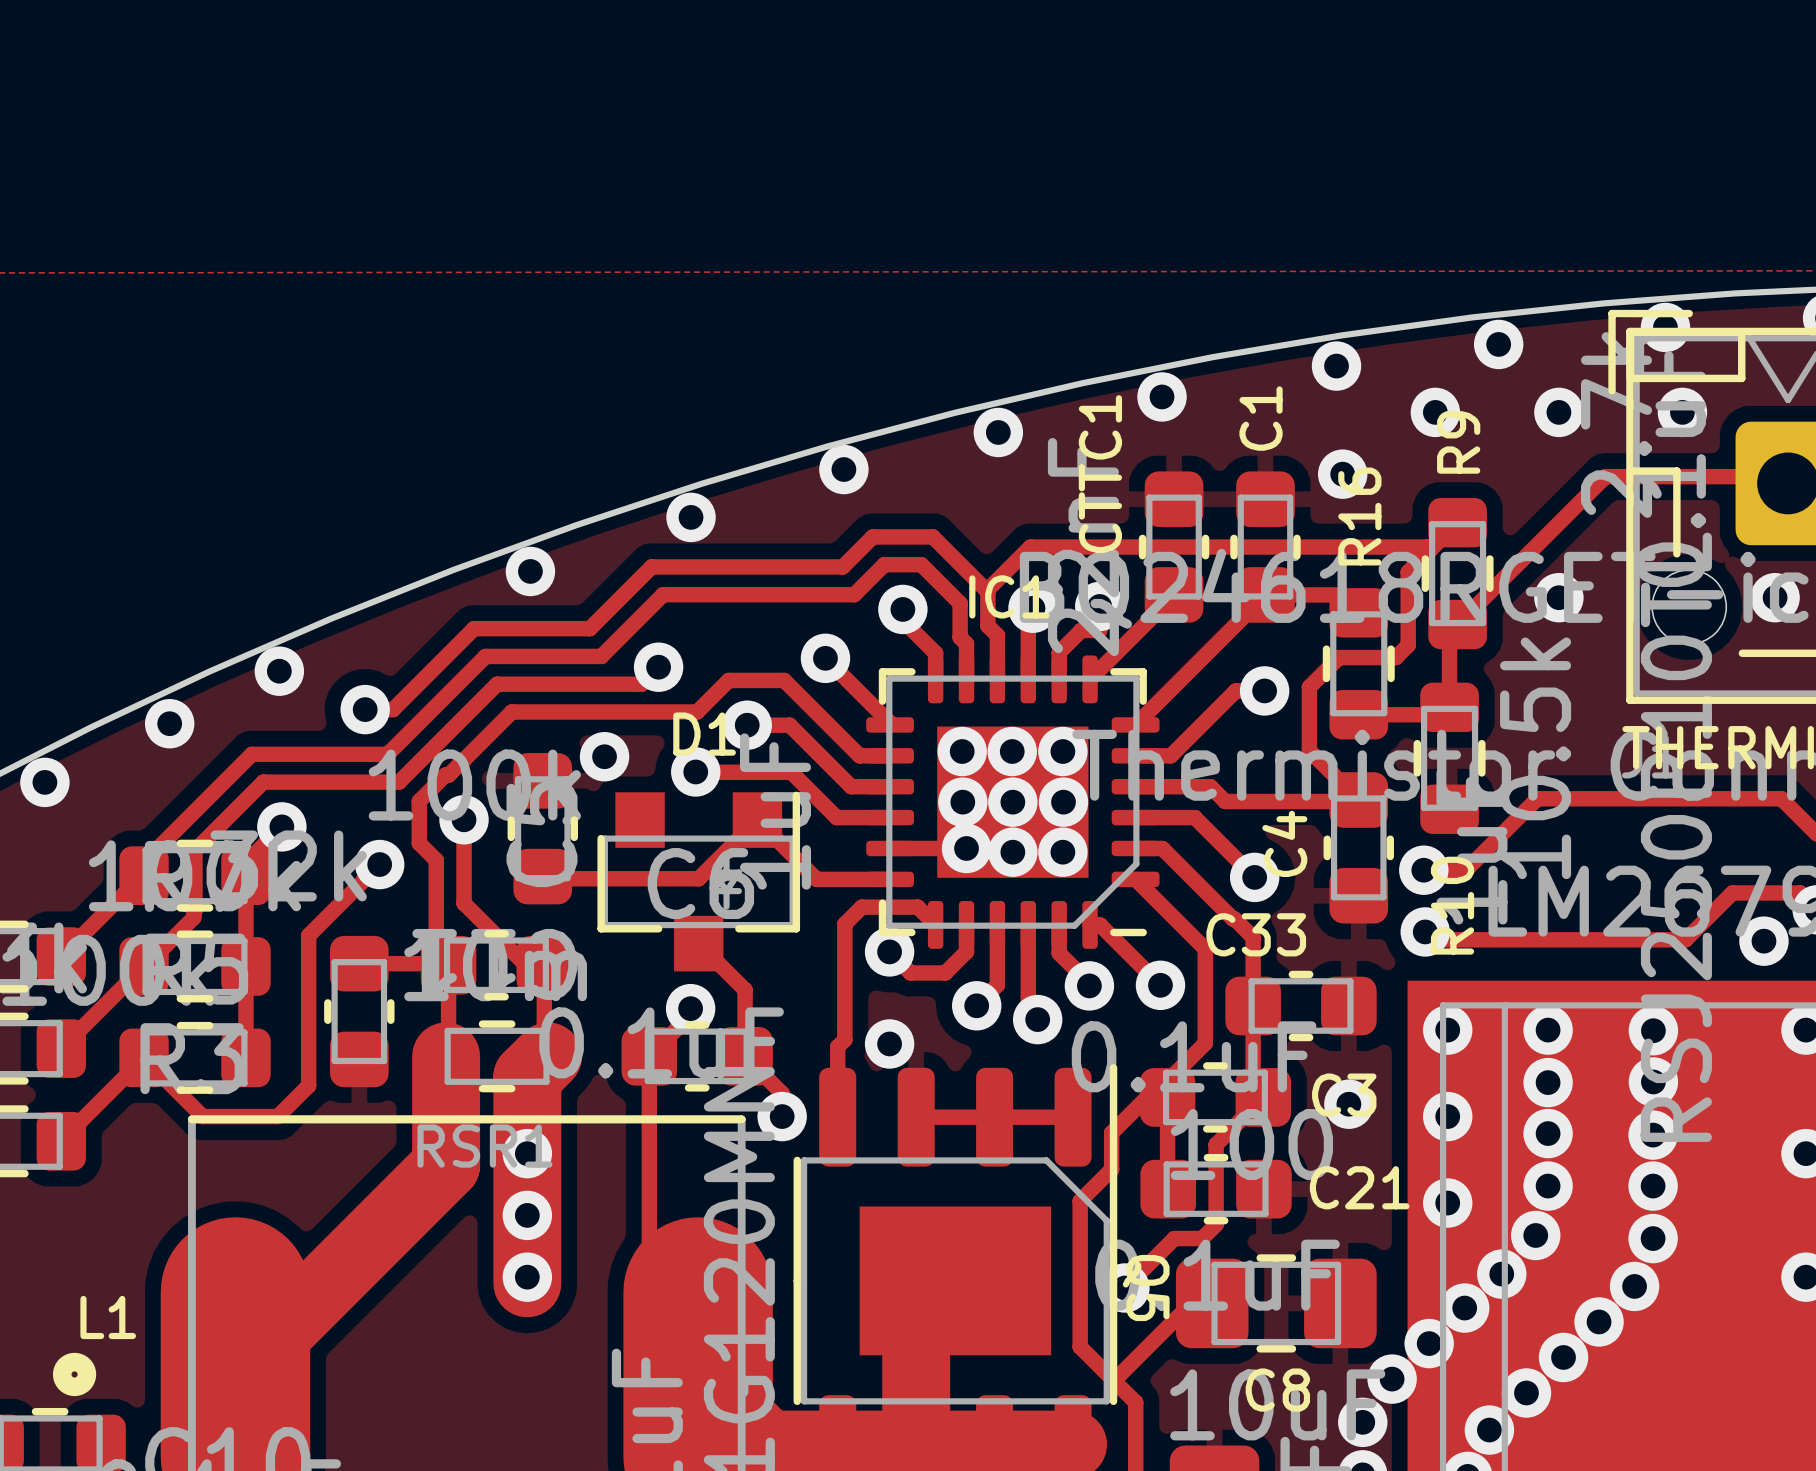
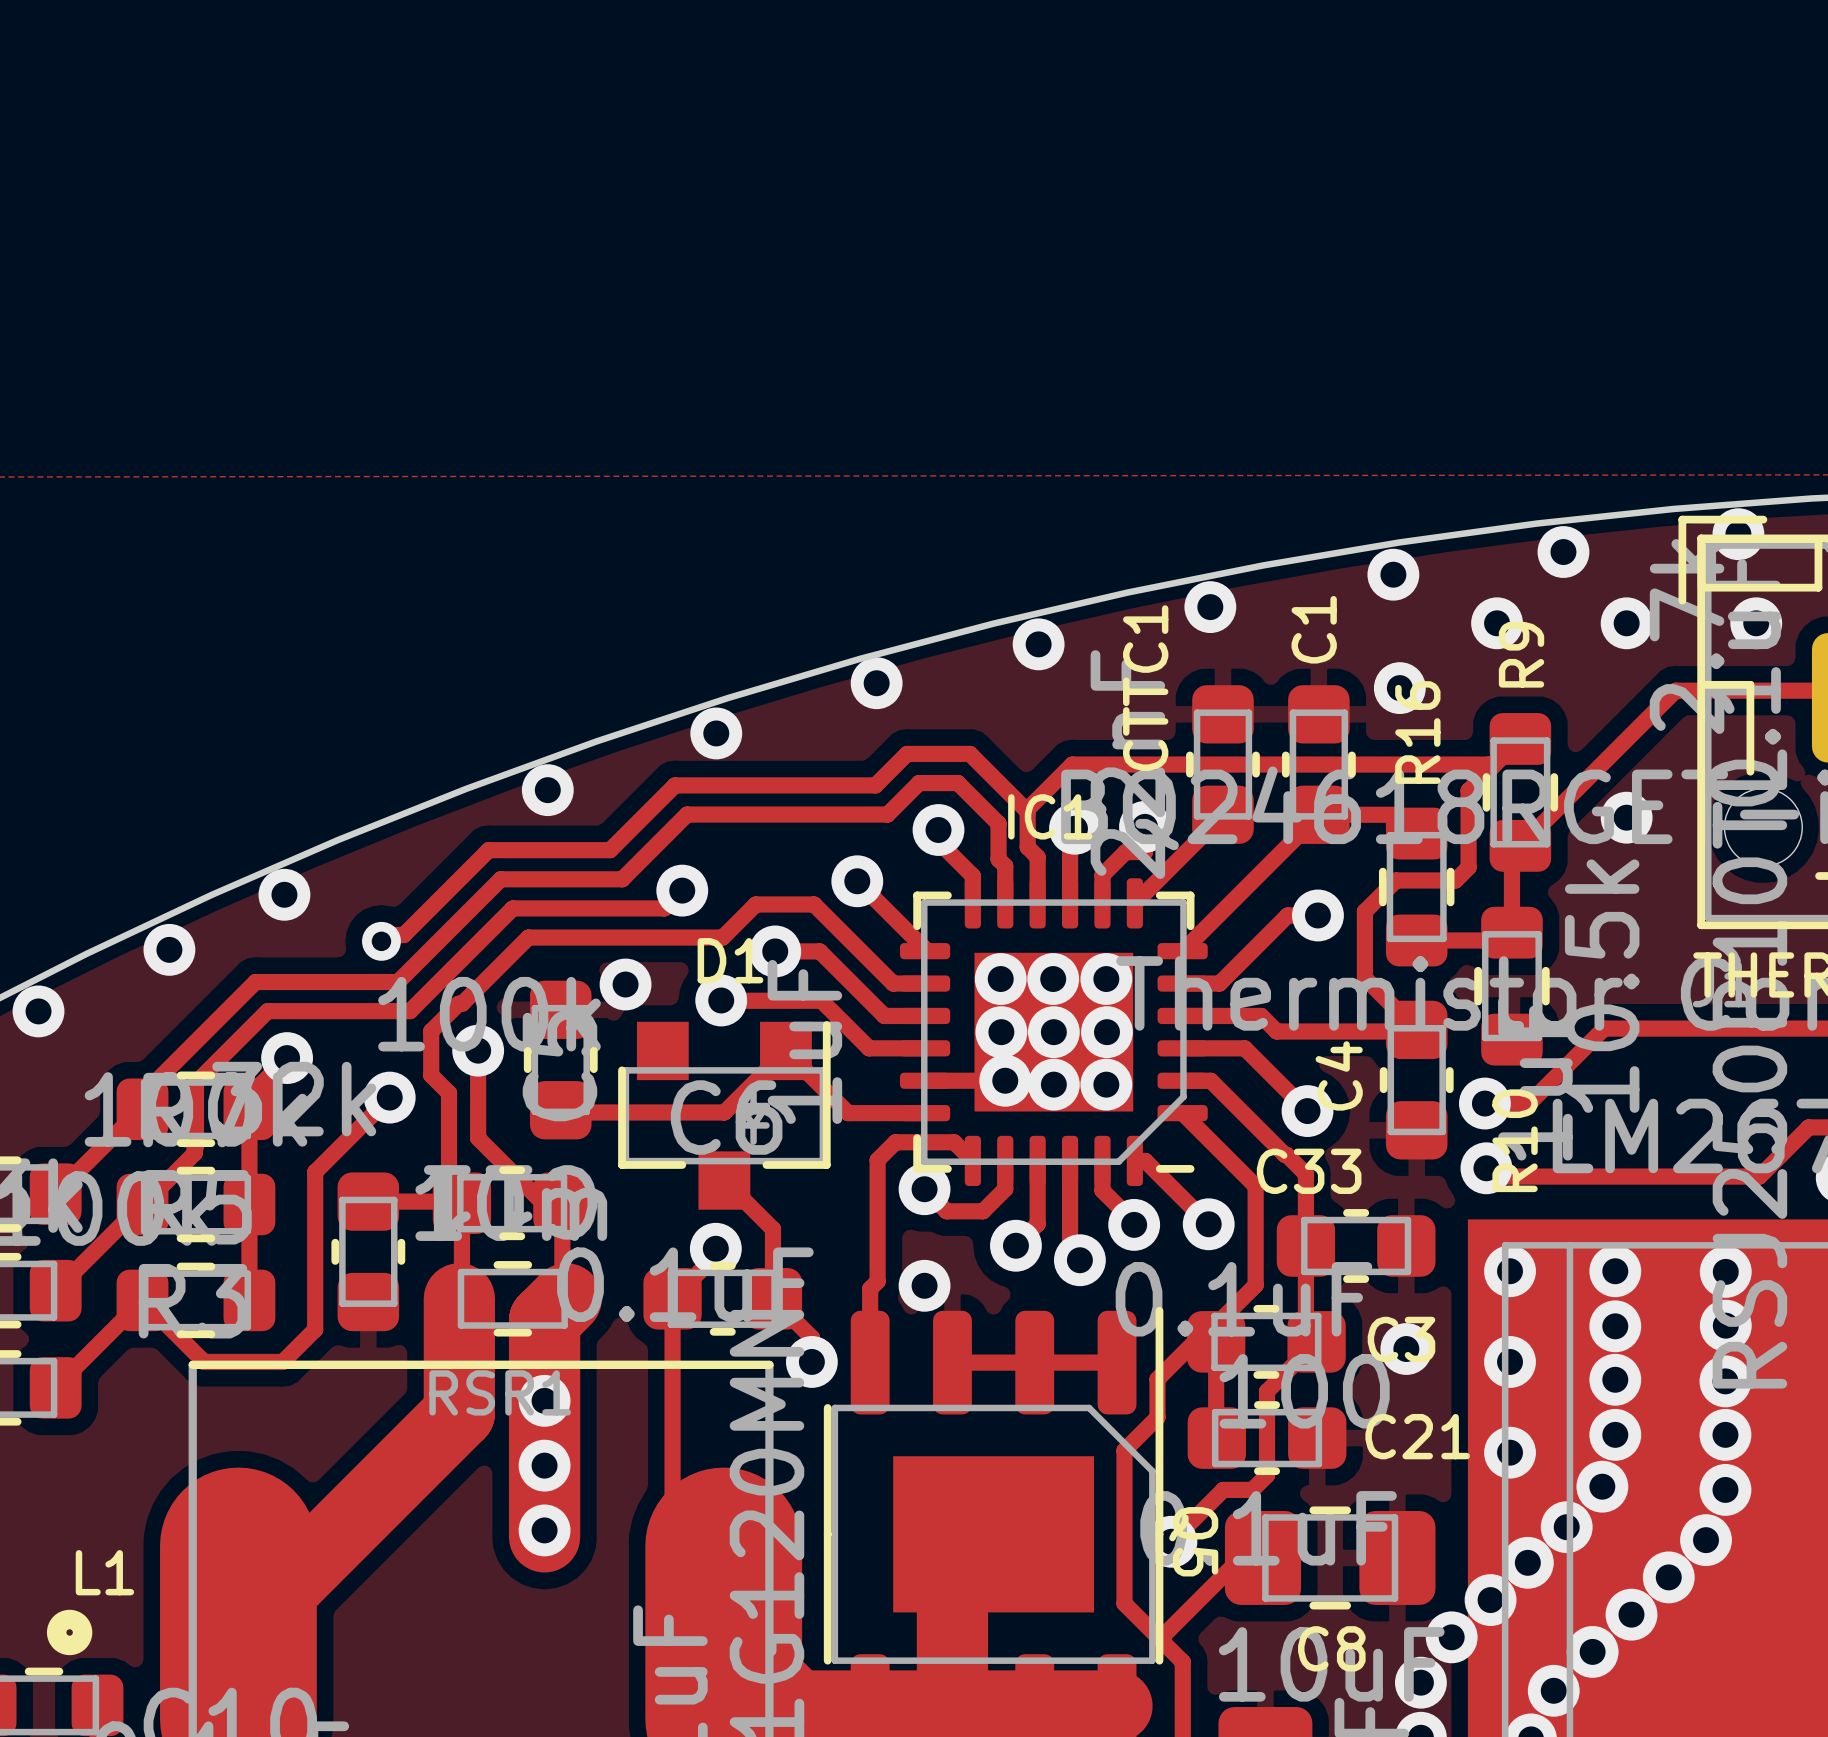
via size: [340, 684, 390, 735] -> [362, 921, 401, 961]

